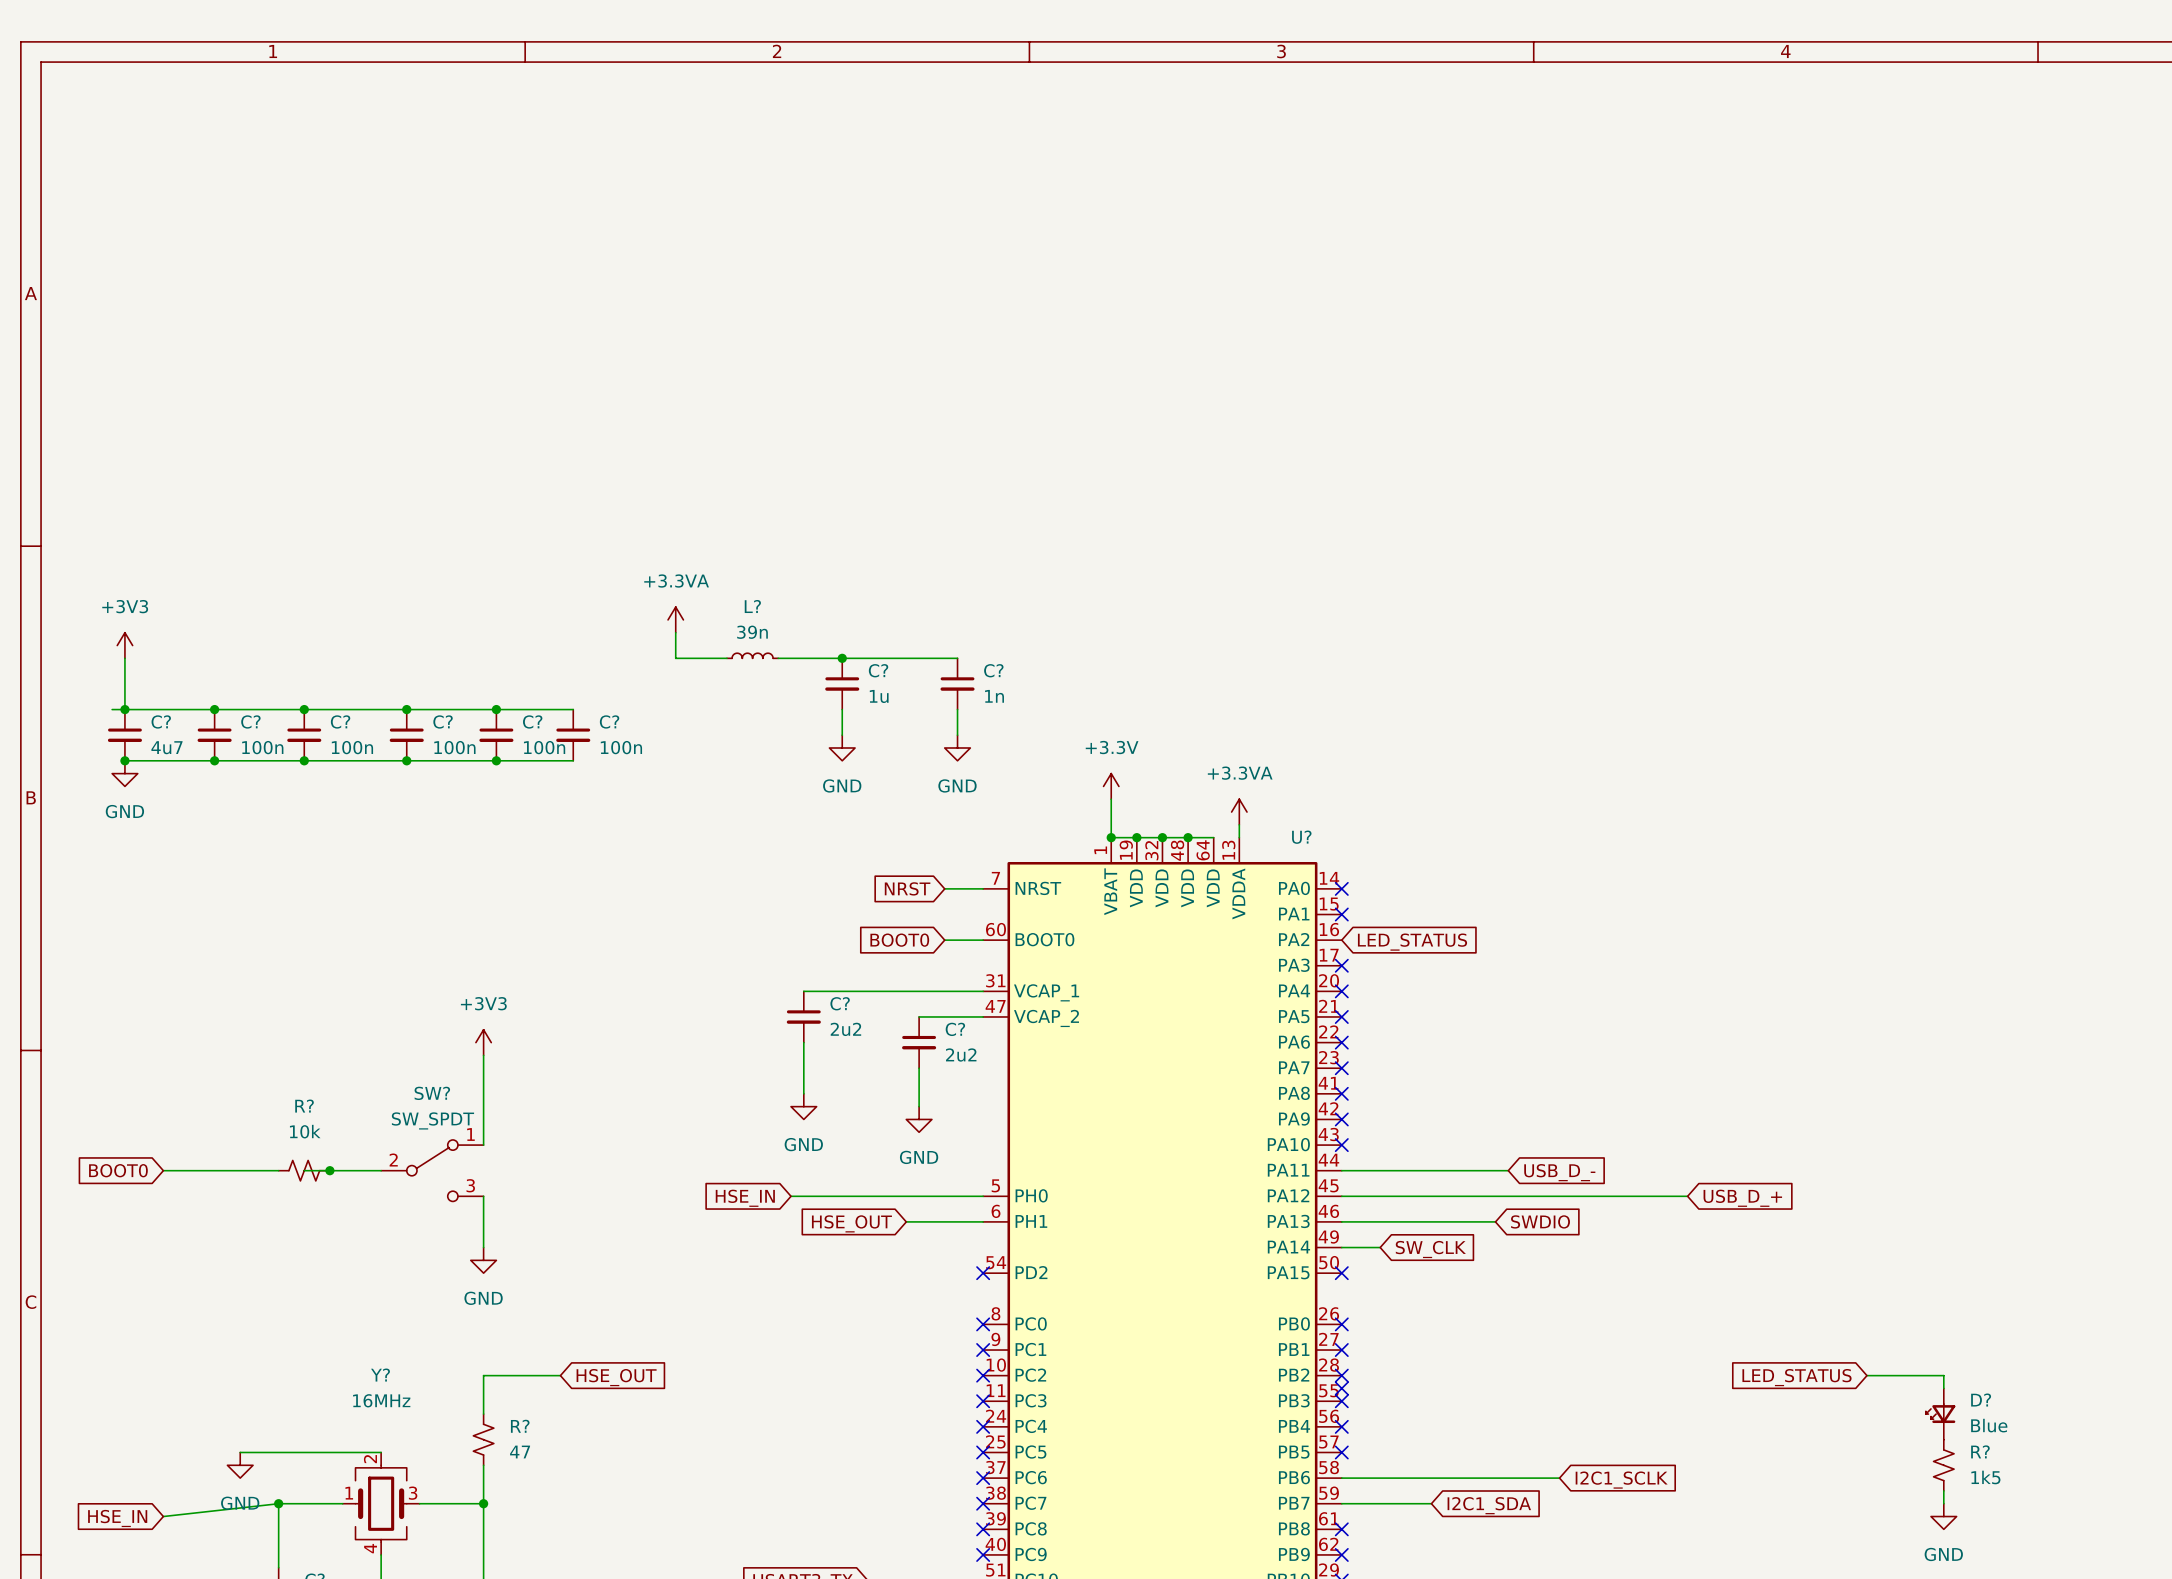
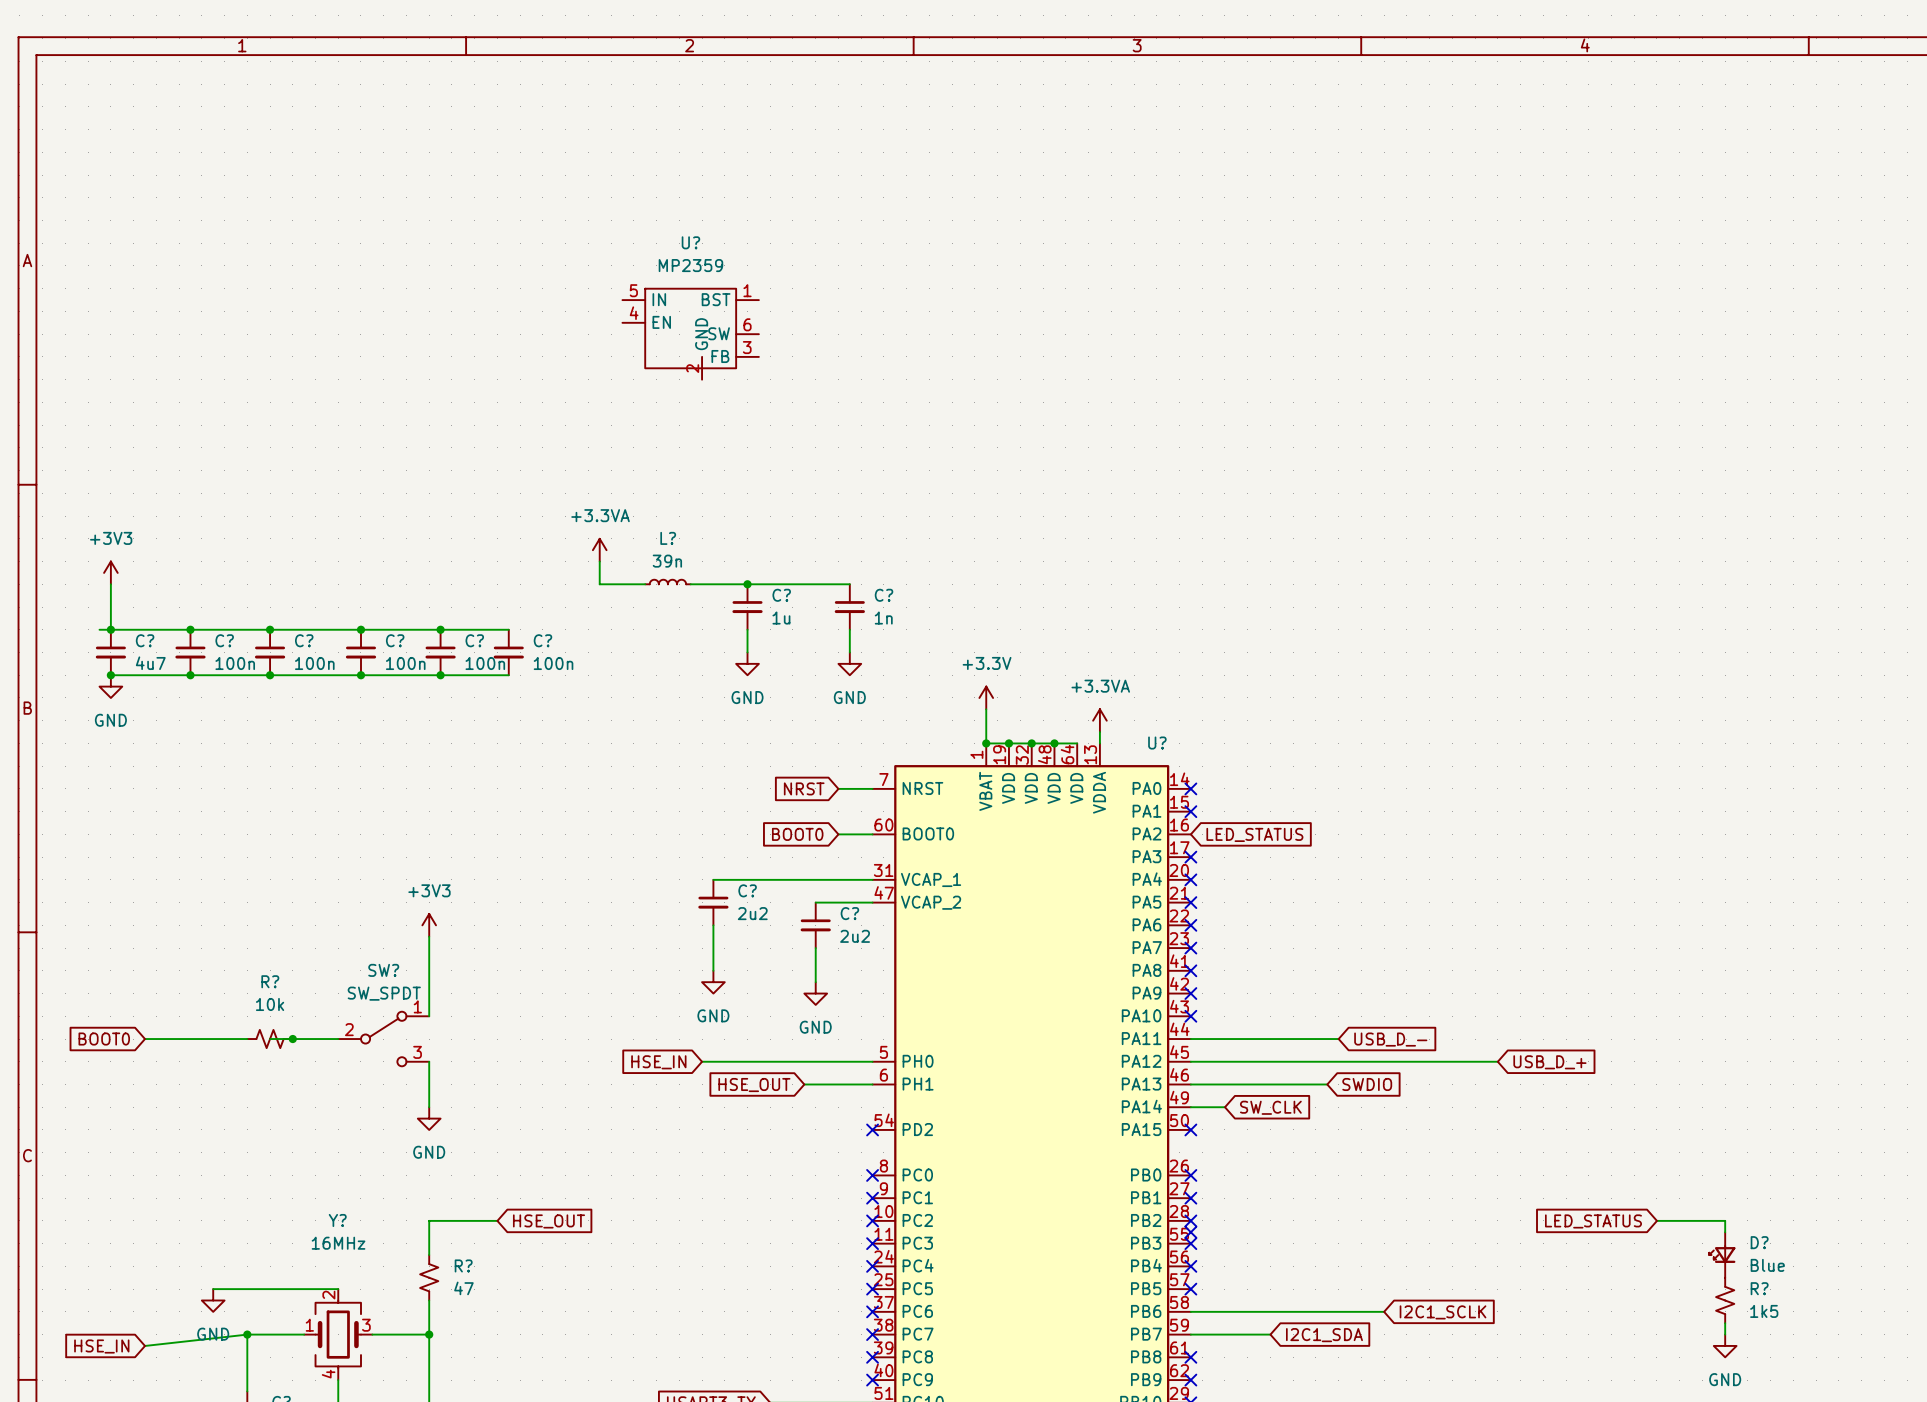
U?: none -> MP2359 (690, 334)

